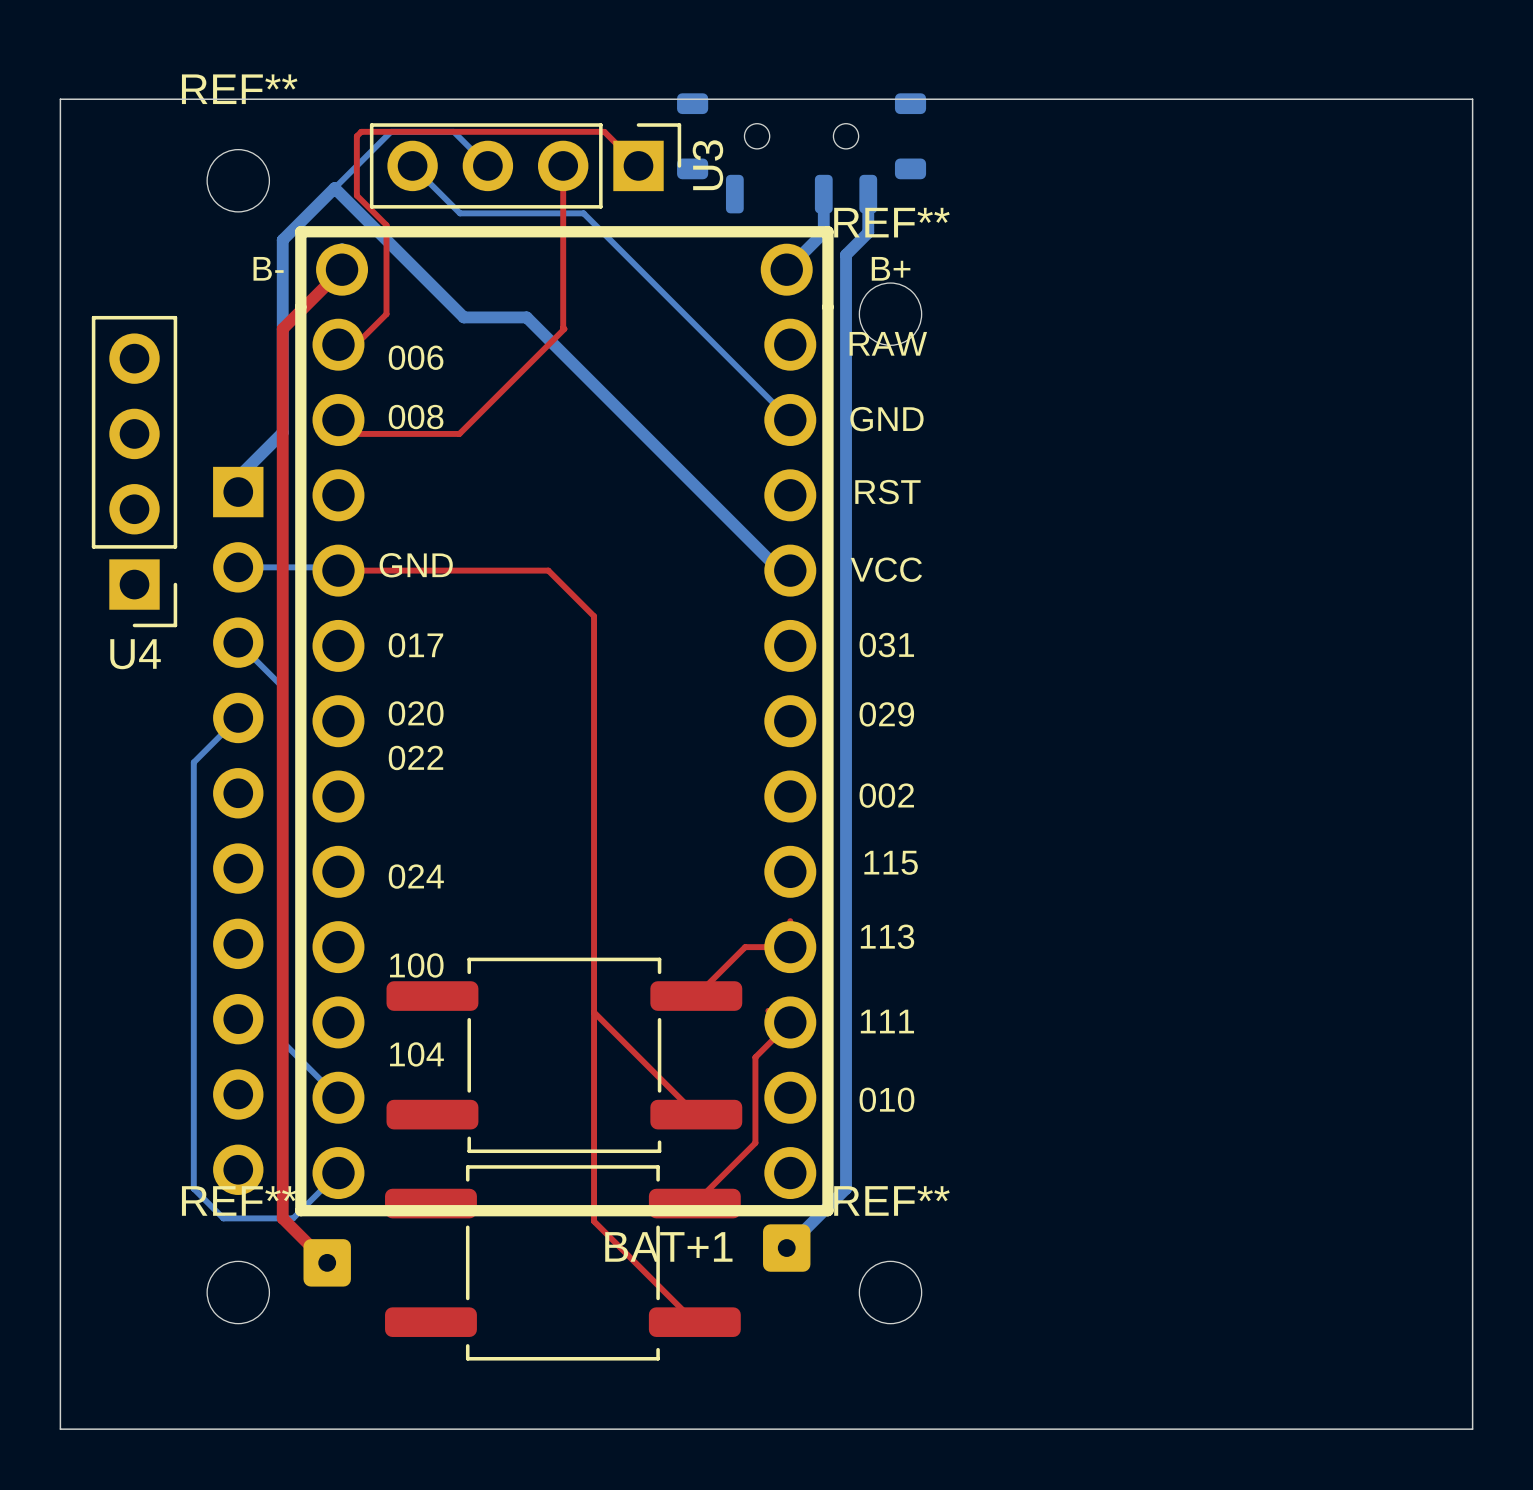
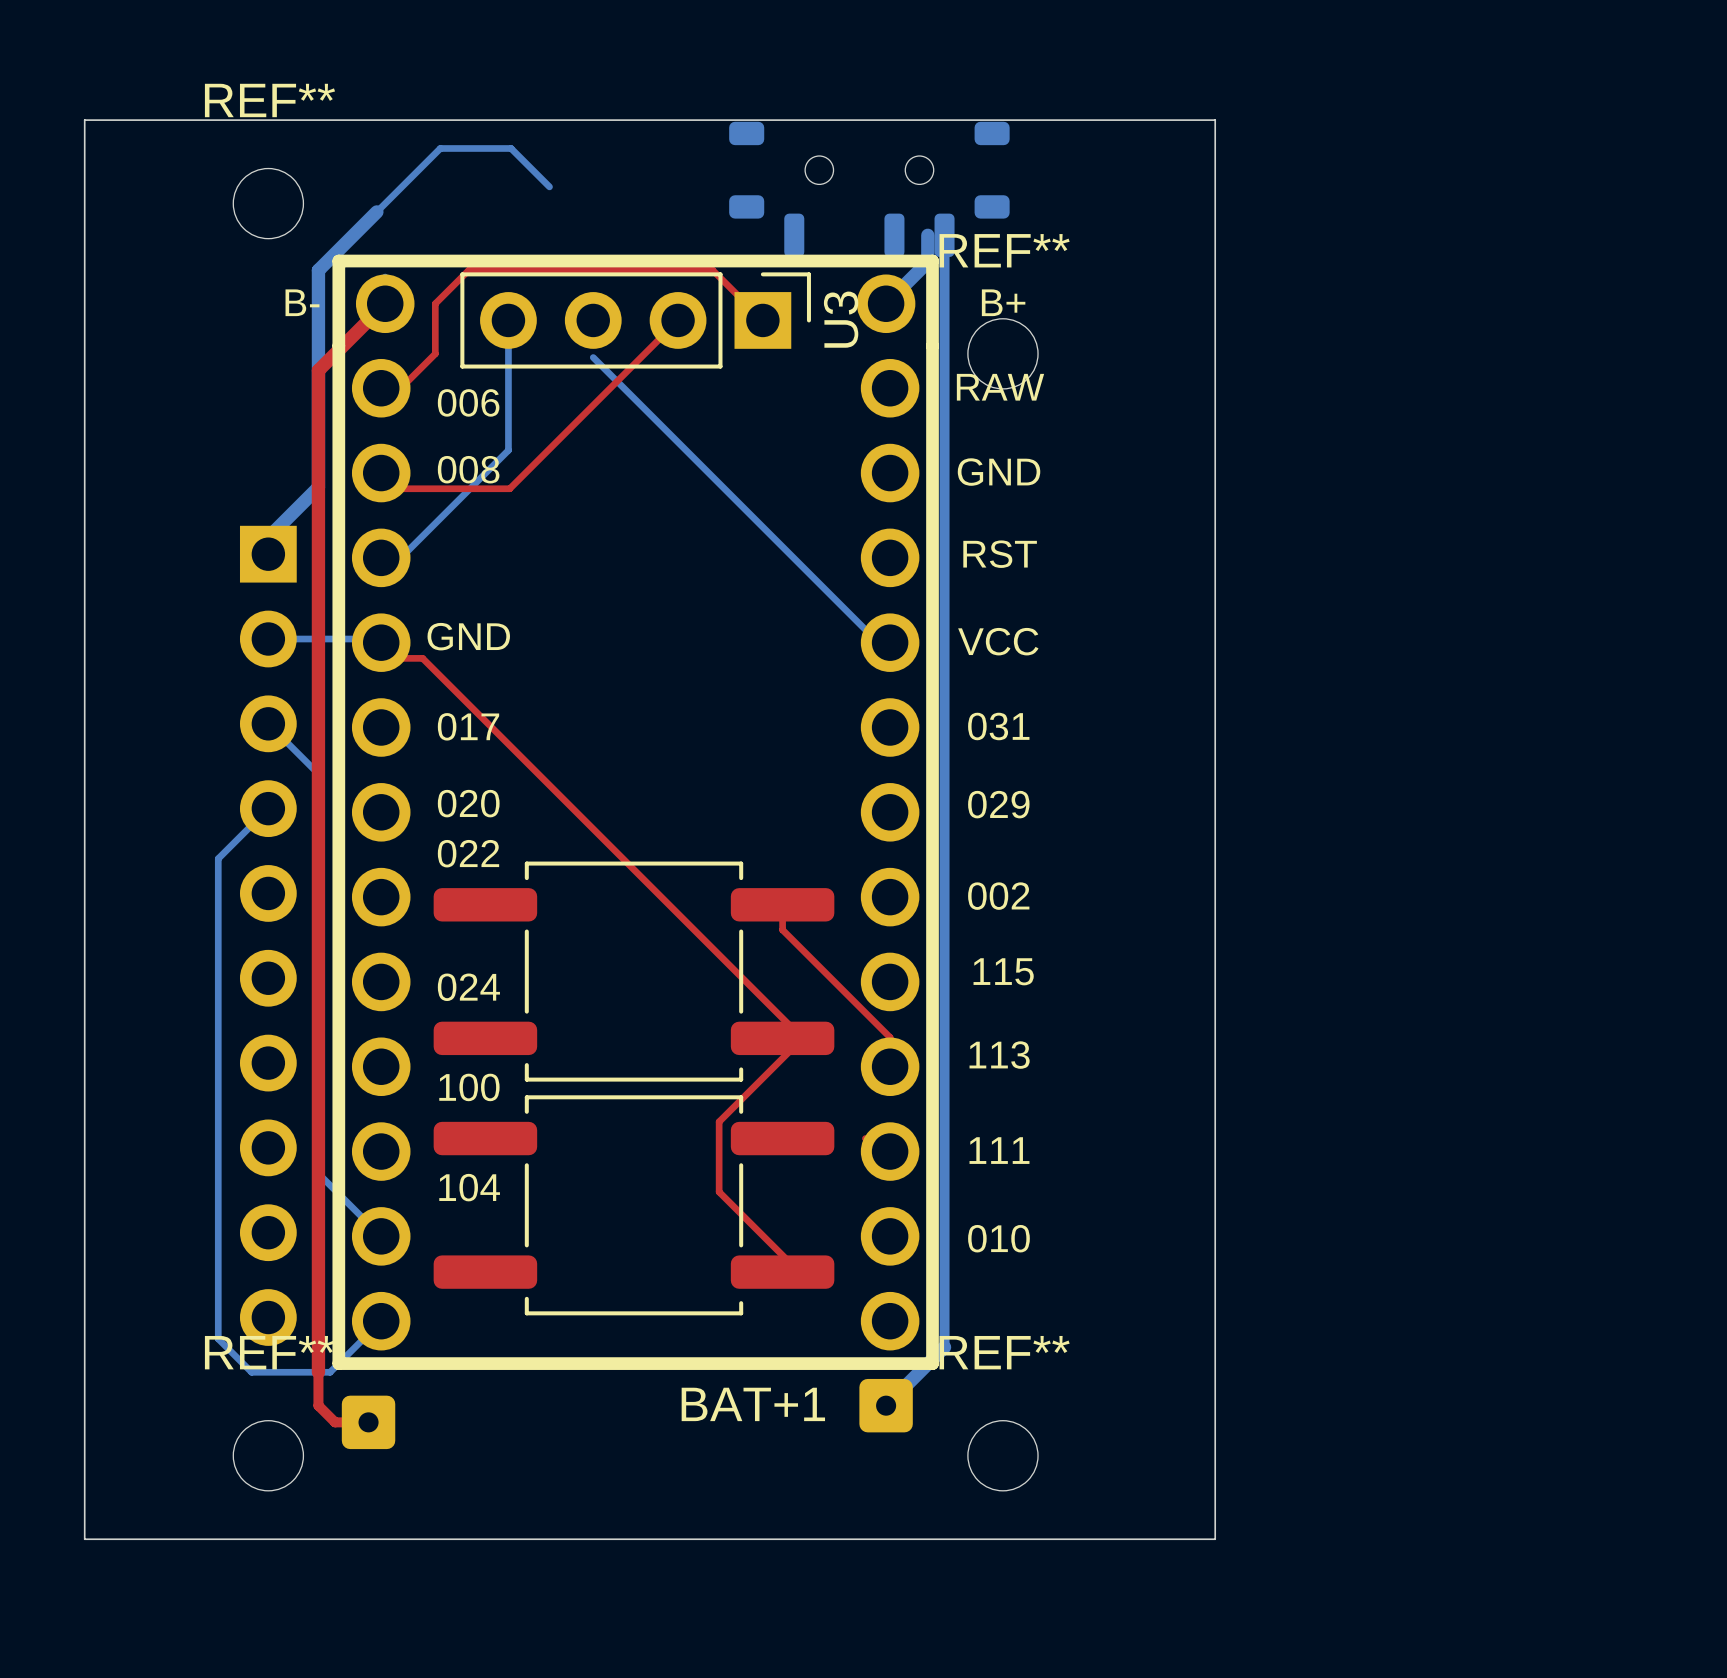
board edge: (60, 99) (1472, 99) (1472, 1429) (60, 1429) (60, 99) -> (84, 120) (84, 1539) (1215, 1539) (1215, 120) (84, 120)
part position: (801, 153) -> (869, 189)
bottom track: (412, 165) (460, 213) (583, 213) (790, 420) -> none
U3 position: (525, 165) -> (635, 320)
top track: (563, 165) (564, 328) (459, 433) (452, 433) -> (678, 320) (509, 488)
top track: (638, 165) (604, 131) (361, 131) (356, 136) (356, 195) (386, 225) (386, 269) -> (762, 320) (712, 270) (468, 270) (435, 303)
bottom track: (334, 188) (463, 317) (526, 317) -> none
bottom track: (868, 208) (868, 232) (846, 254) (846, 1188) (838, 1196) -> (944, 252) (944, 1347)
bottom track: none -> (508, 320) (508, 450) (385, 573)
bottom track width: thick (526, 317) (793, 584) -> thin (593, 357) (894, 658)
U4: (134, 471) -> none
top track: (338, 570) (548, 570) (594, 616) (594, 1221) (694, 1322) -> none
top track: none -> (385, 658) (422, 658) (802, 1038) (719, 1121) (719, 1191) (799, 1272)
top track: none -> (782, 904) (782, 929) (890, 1037)
top track: (790, 947) (745, 947) (696, 996) -> none
top track: (594, 1012) (696, 1114) -> none
top track: (790, 1022) (755, 1057) (755, 1142) (694, 1203) -> none
part position: (564, 1055) -> (634, 1205)
top track: (282, 1218) (327, 1262) -> (318, 1372) (318, 1405) (335, 1422) (368, 1422)
part position: (562, 1262) -> (634, 971)

